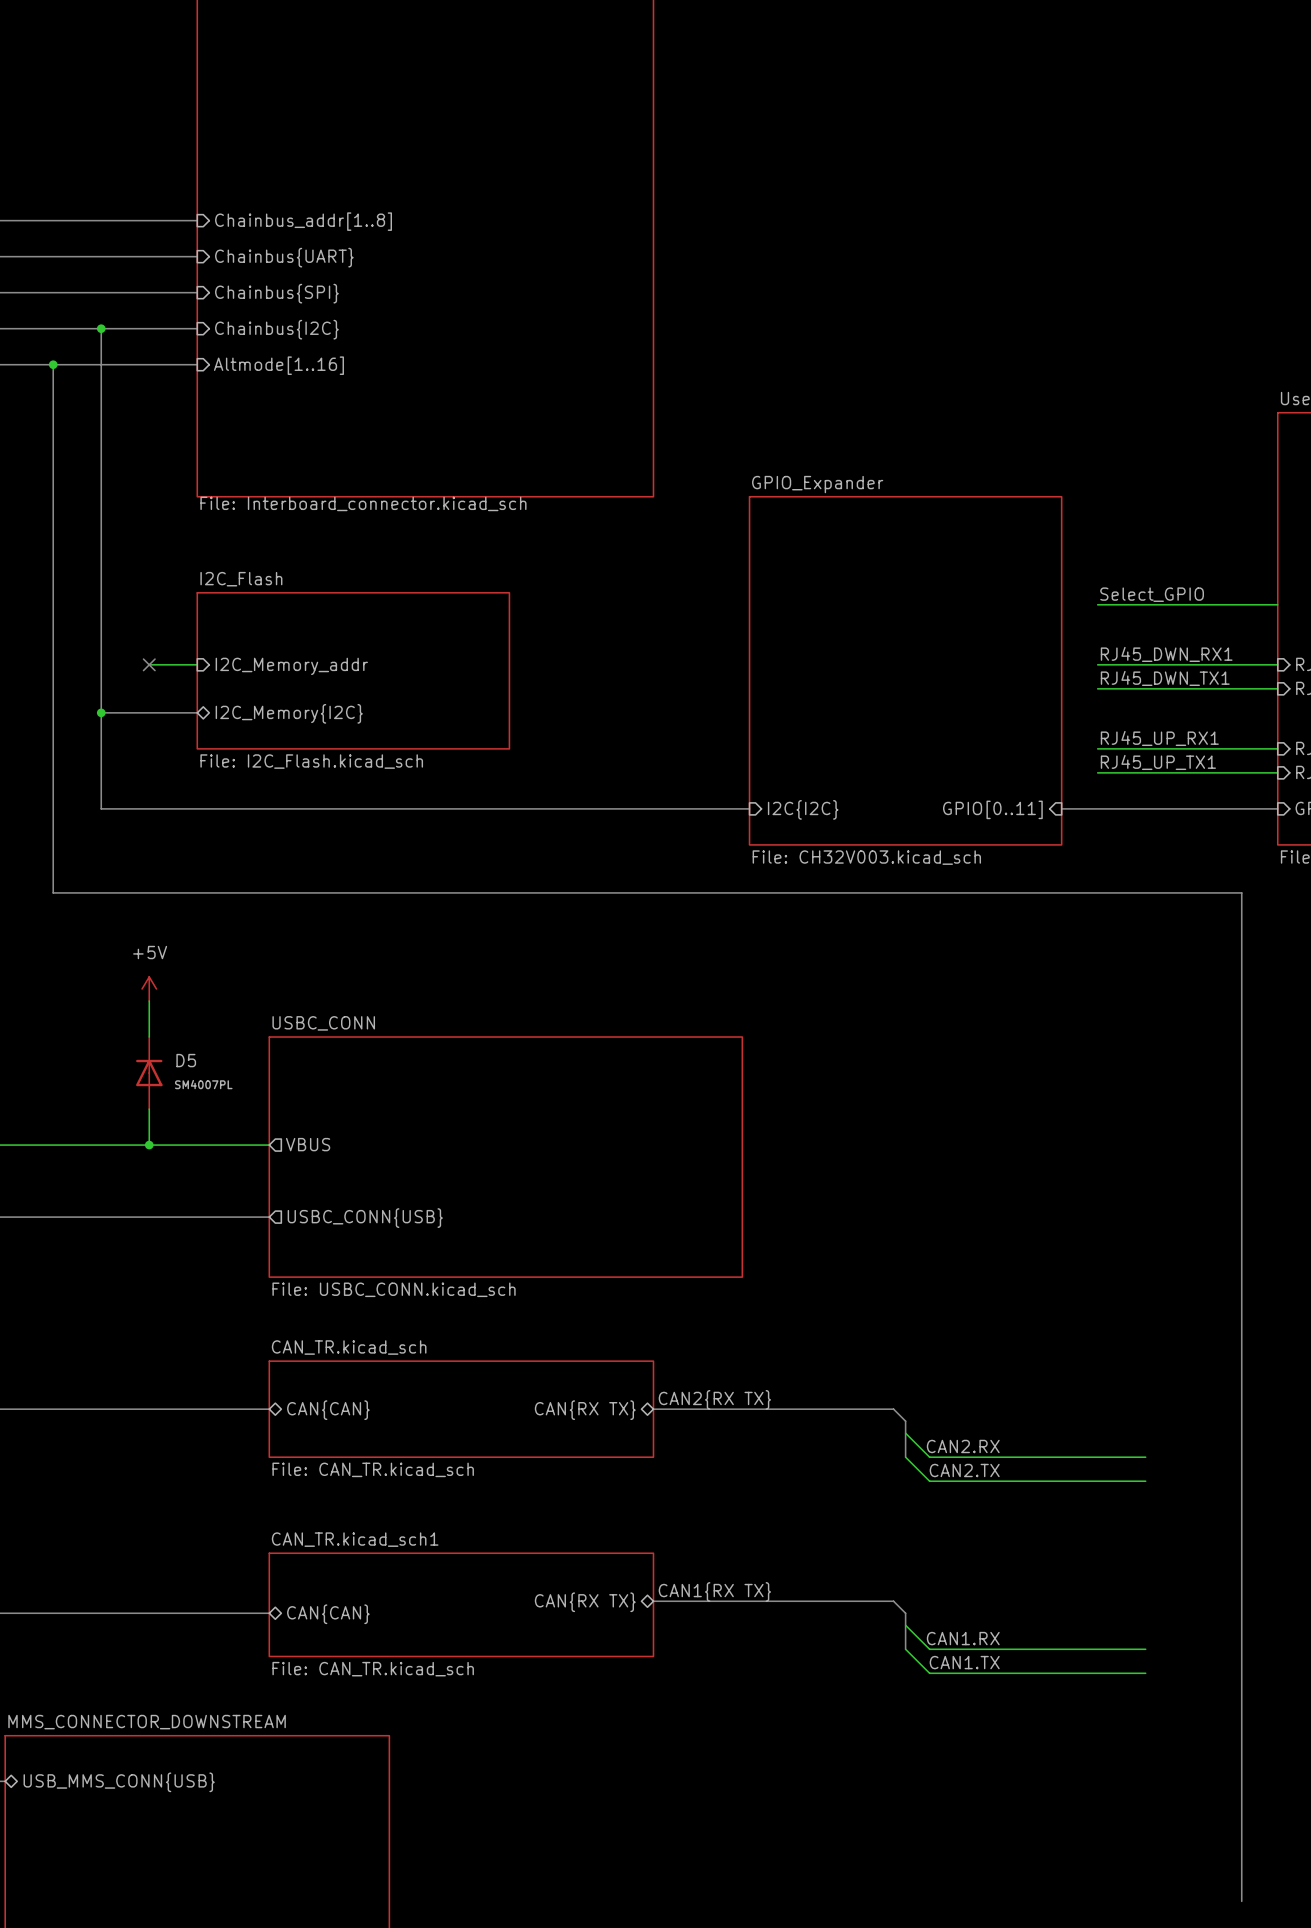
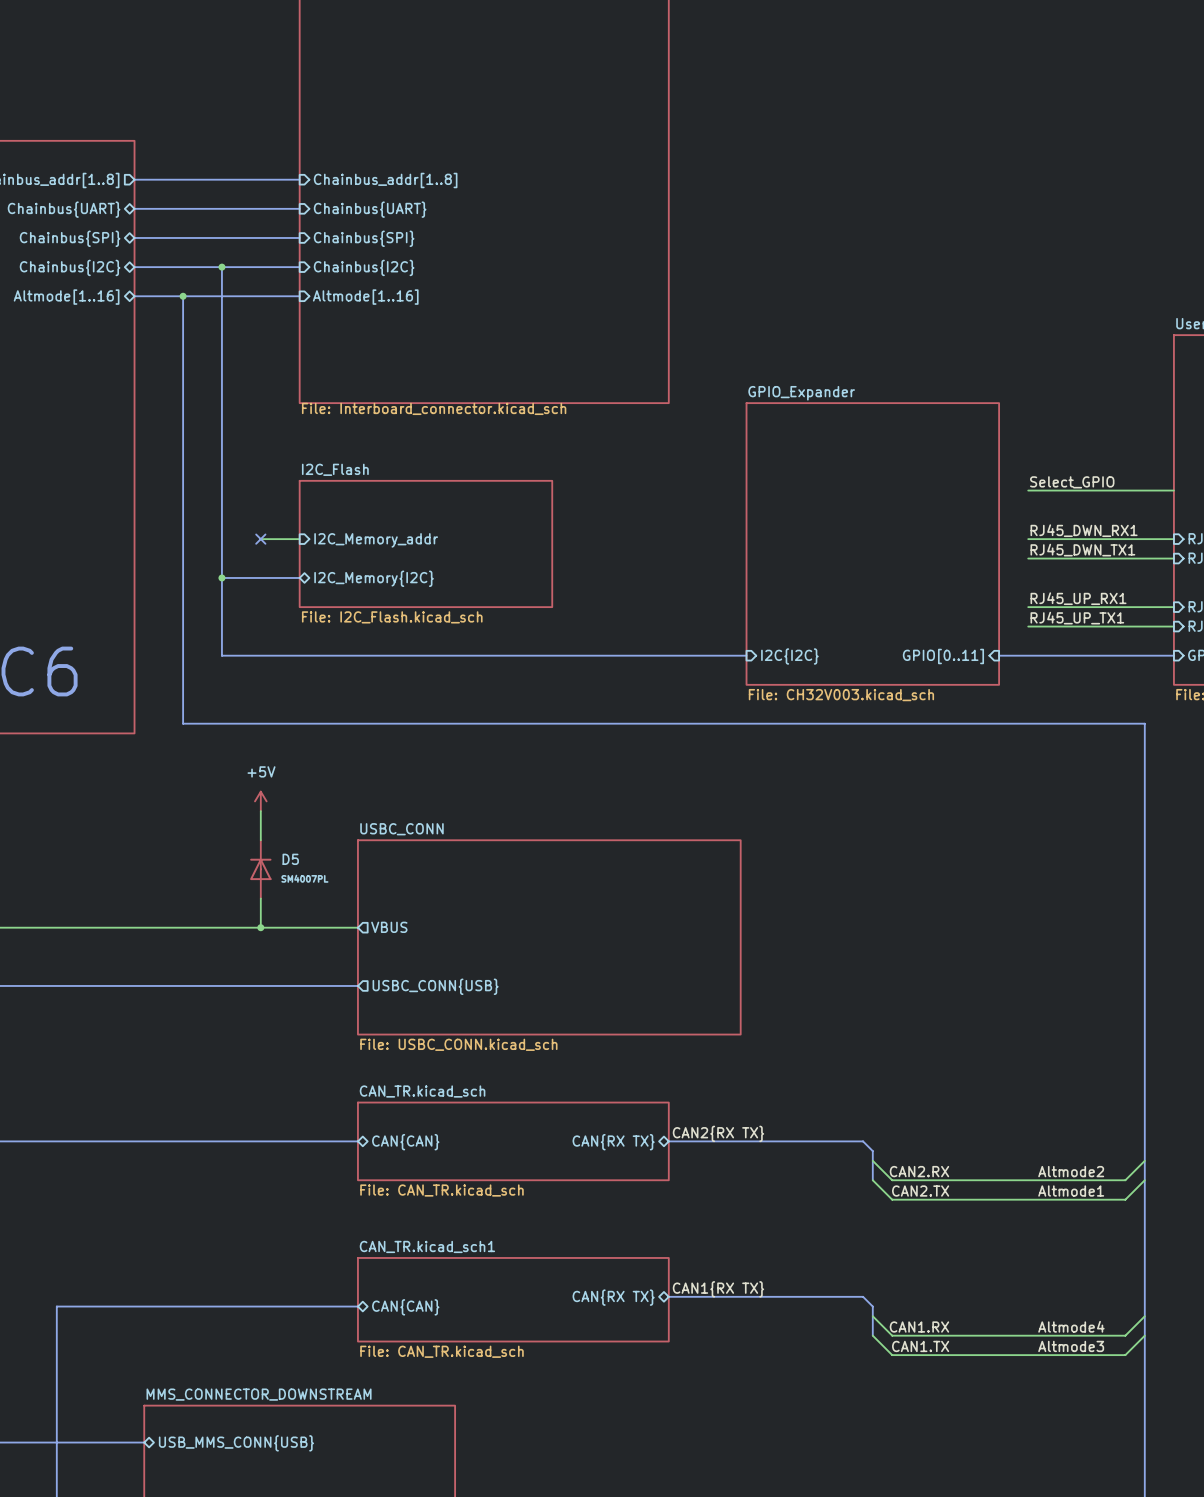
wire: none -> (1144, 1160) (1125, 1180) (1067, 1180)
label: none -> Altmode2 (1071, 1171)
wire: none -> (1144, 1180) (1125, 1199) (1067, 1199)
label: none -> Altmode1 (1071, 1191)
wire: none -> (1144, 1316) (1125, 1335) (1067, 1335)
label: none -> Altmode4 (1071, 1326)
wire: none -> (1144, 1335) (1125, 1355) (1067, 1355)
label: none -> Altmode3 (1071, 1346)

